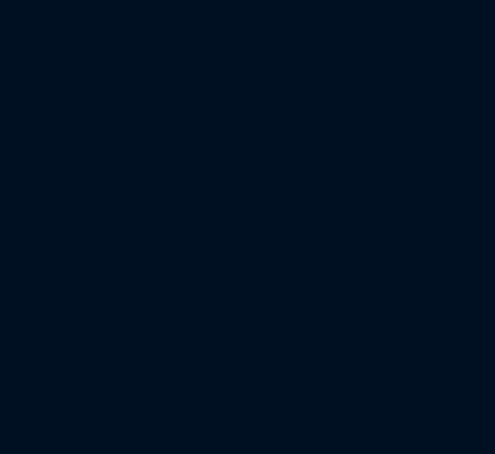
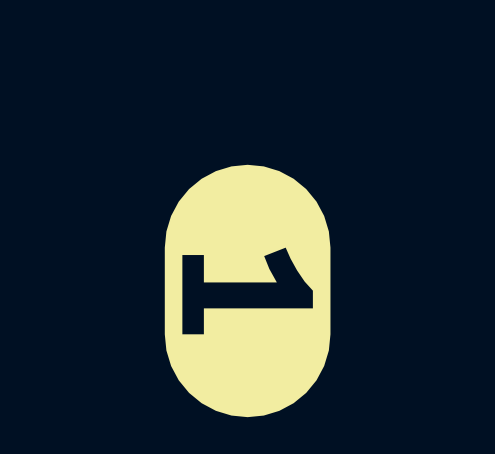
drawing: none -> [164, 164, 331, 418]

